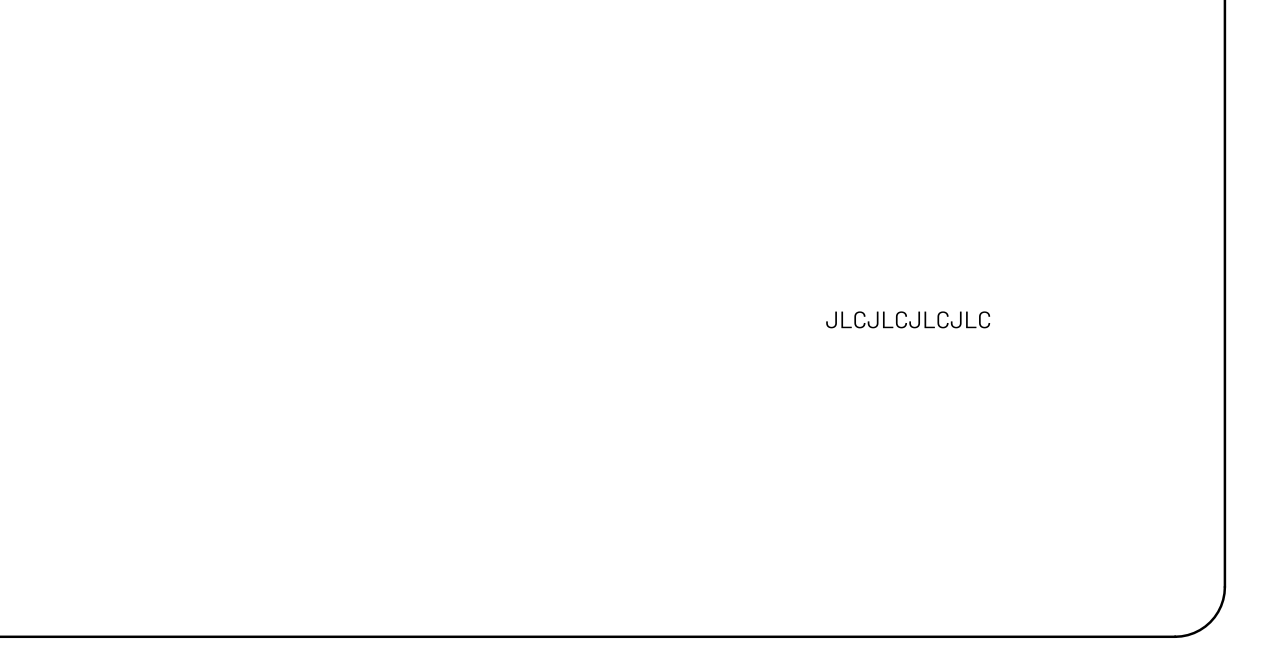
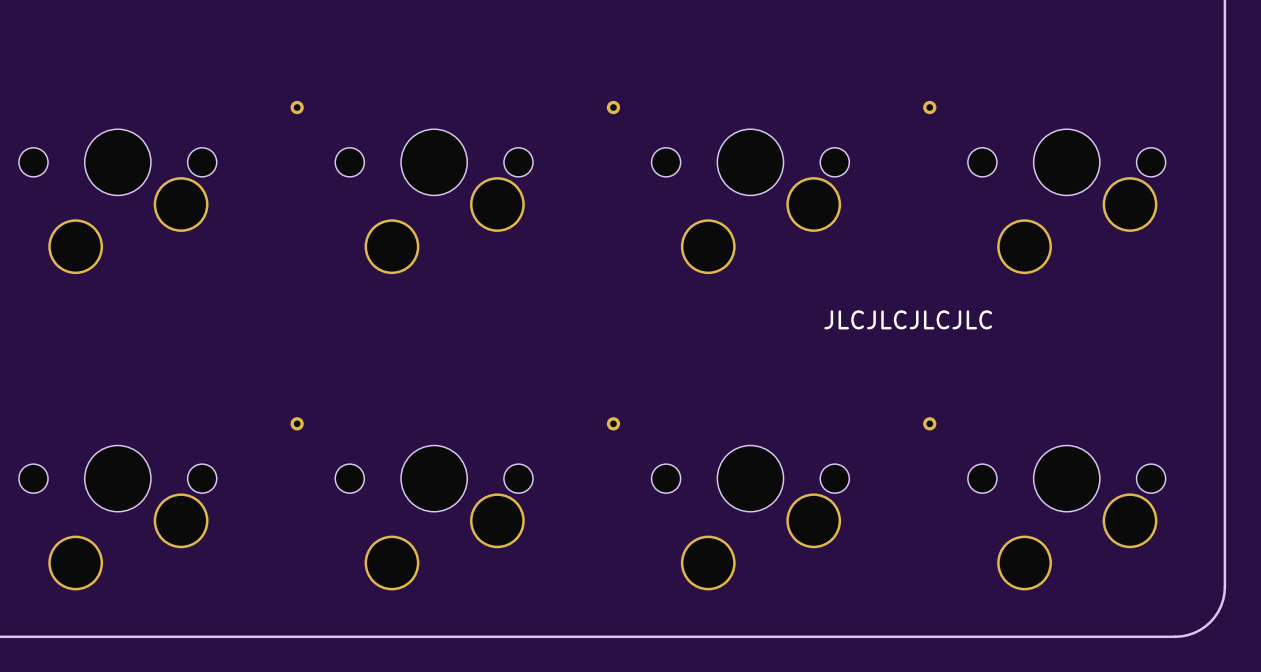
part: none -> (297, 107)
part: none -> (613, 107)
part: none -> (929, 107)
part: none -> (117, 201)
part: none -> (434, 201)
part: none -> (750, 201)
part: none -> (1066, 201)
part: none -> (297, 423)
part: none -> (613, 423)
part: none -> (929, 423)
part: none -> (117, 517)
part: none -> (434, 517)
part: none -> (750, 517)
part: none -> (1066, 517)

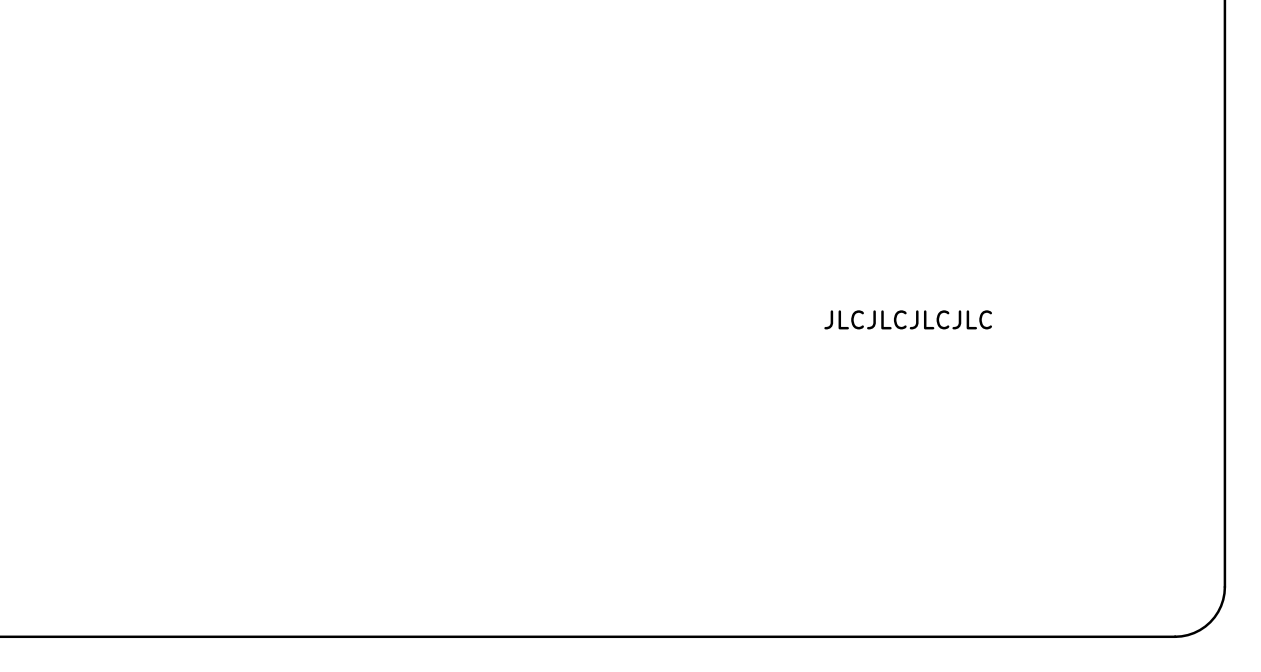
part: (297, 107) -> none
part: (613, 107) -> none
part: (929, 107) -> none
part: (117, 201) -> none
part: (434, 201) -> none
part: (750, 201) -> none
part: (1066, 201) -> none
part: (297, 423) -> none
part: (613, 423) -> none
part: (929, 423) -> none
part: (117, 517) -> none
part: (434, 517) -> none
part: (750, 517) -> none
part: (1066, 517) -> none

